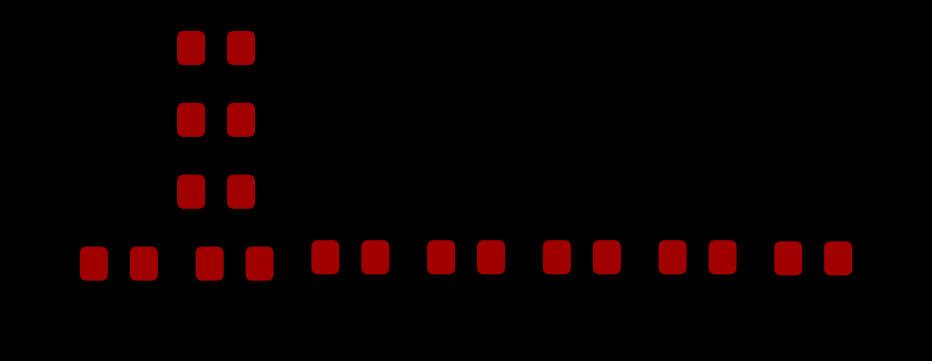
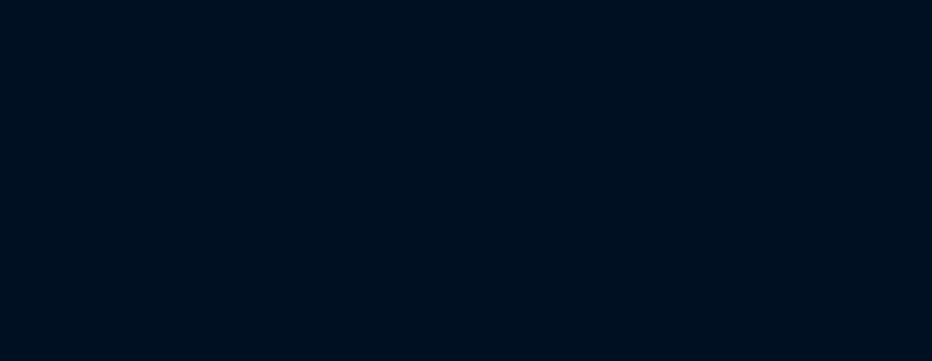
part: (216, 47) -> none
part: (216, 119) -> none
part: (216, 191) -> none
part: (350, 257) -> none
part: (466, 257) -> none
part: (581, 257) -> none
part: (697, 257) -> none
part: (813, 258) -> none
part: (118, 263) -> none
part: (234, 263) -> none

